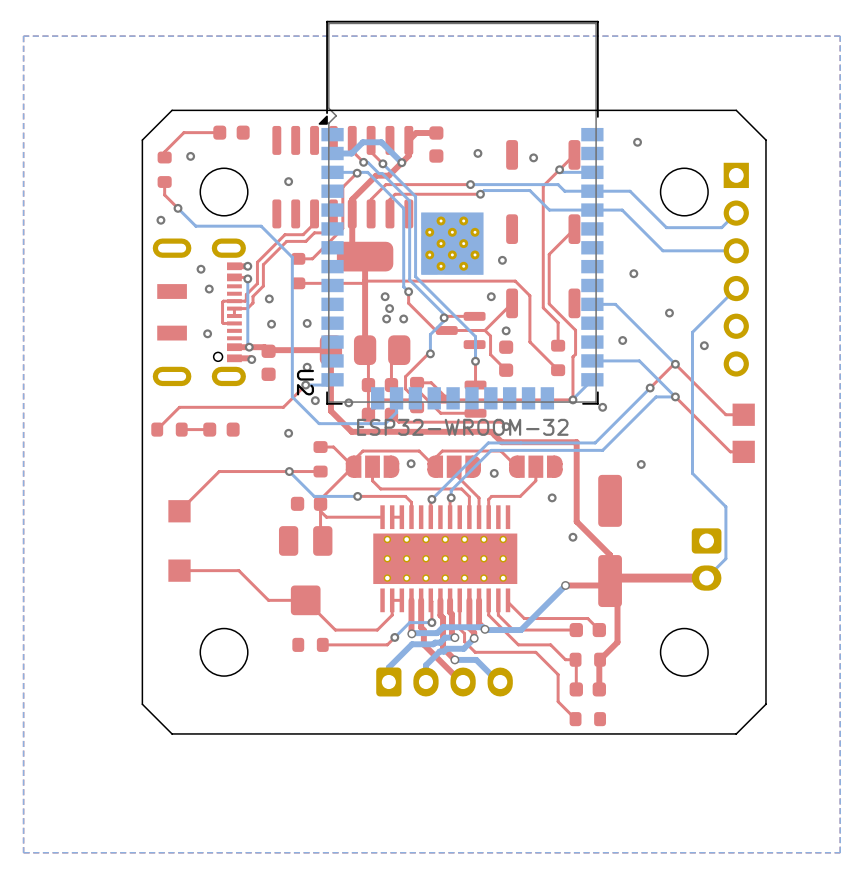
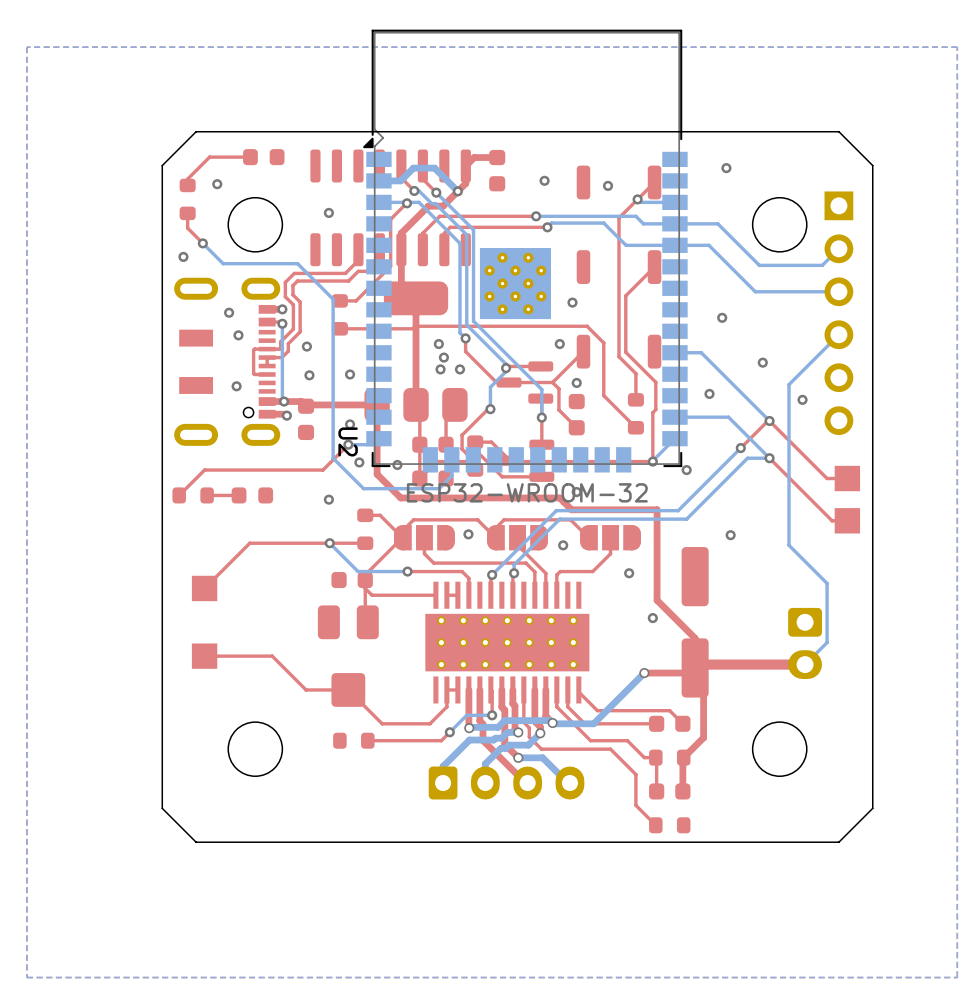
top track: (285, 234) (257, 262) -> (324, 273) (294, 273) (285, 282) (285, 296) (293, 304)
top track: (286, 241) (263, 264) -> (326, 281) (297, 281) (292, 285) (292, 294) (300, 302) (300, 307)
top track: (391, 414) (398, 422) (501, 422) (506, 426) -> none

